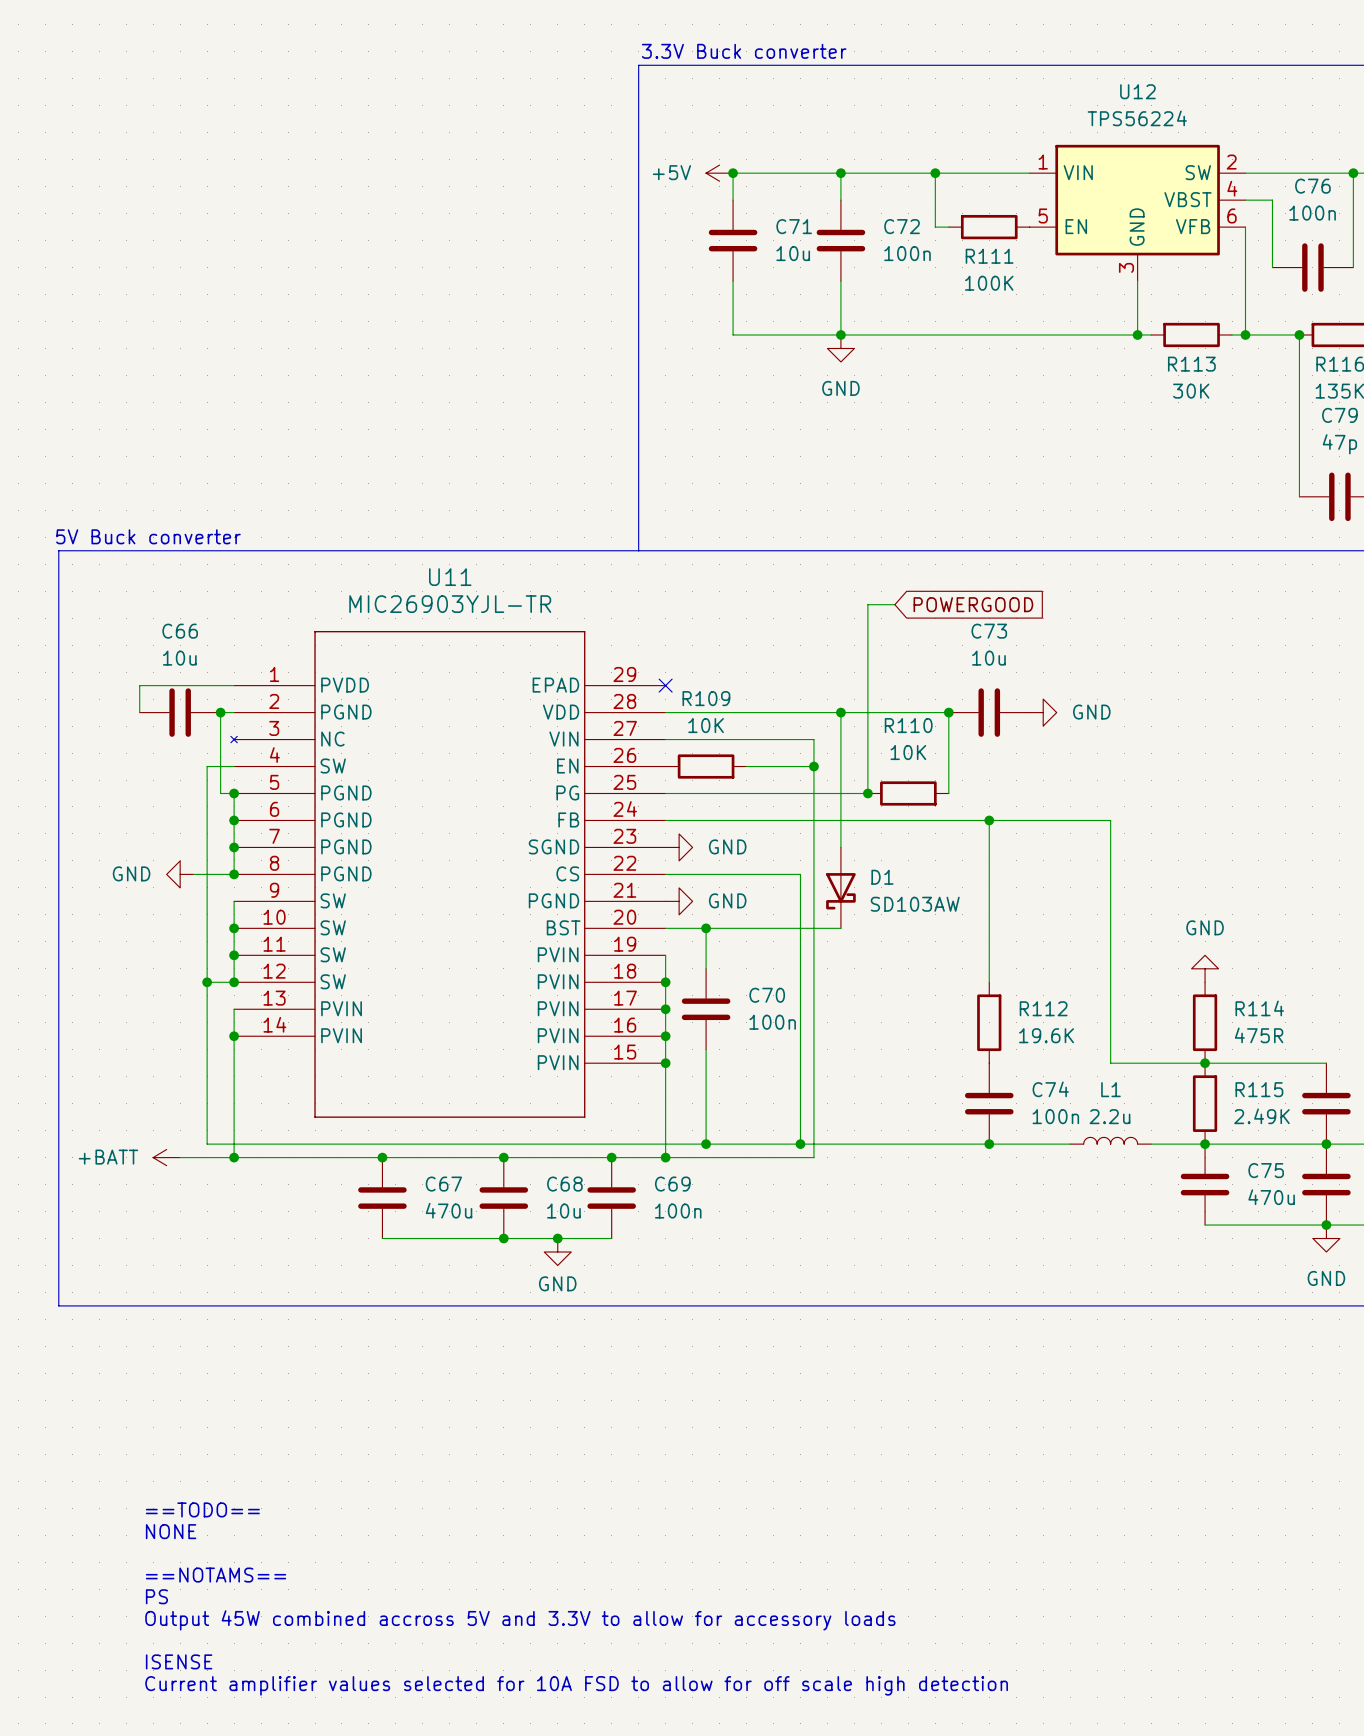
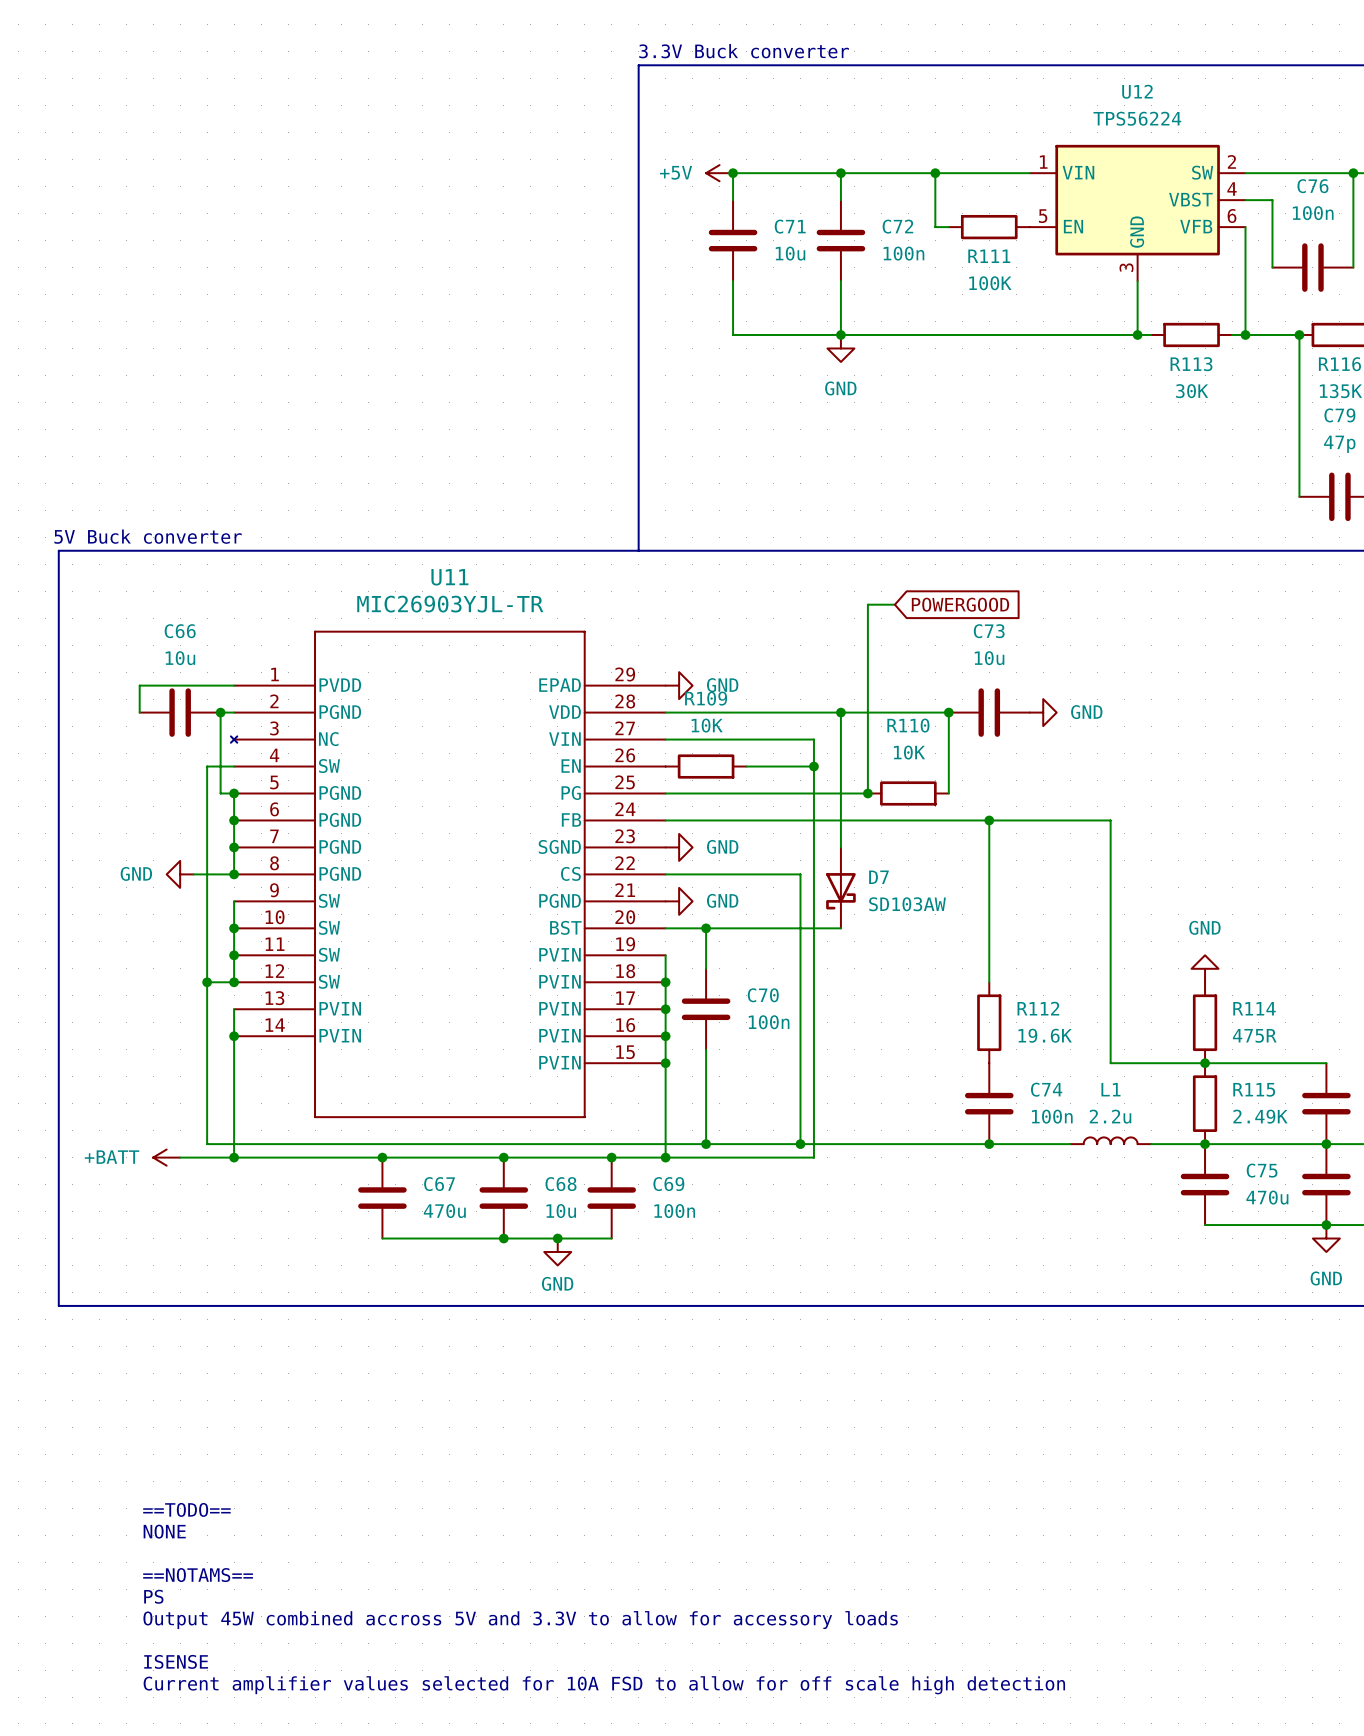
no-connect mark: (665, 685) -> none
power symbol: none -> GND (679, 685)
D1 name: D1 (882, 877) -> D7 (878, 877)

